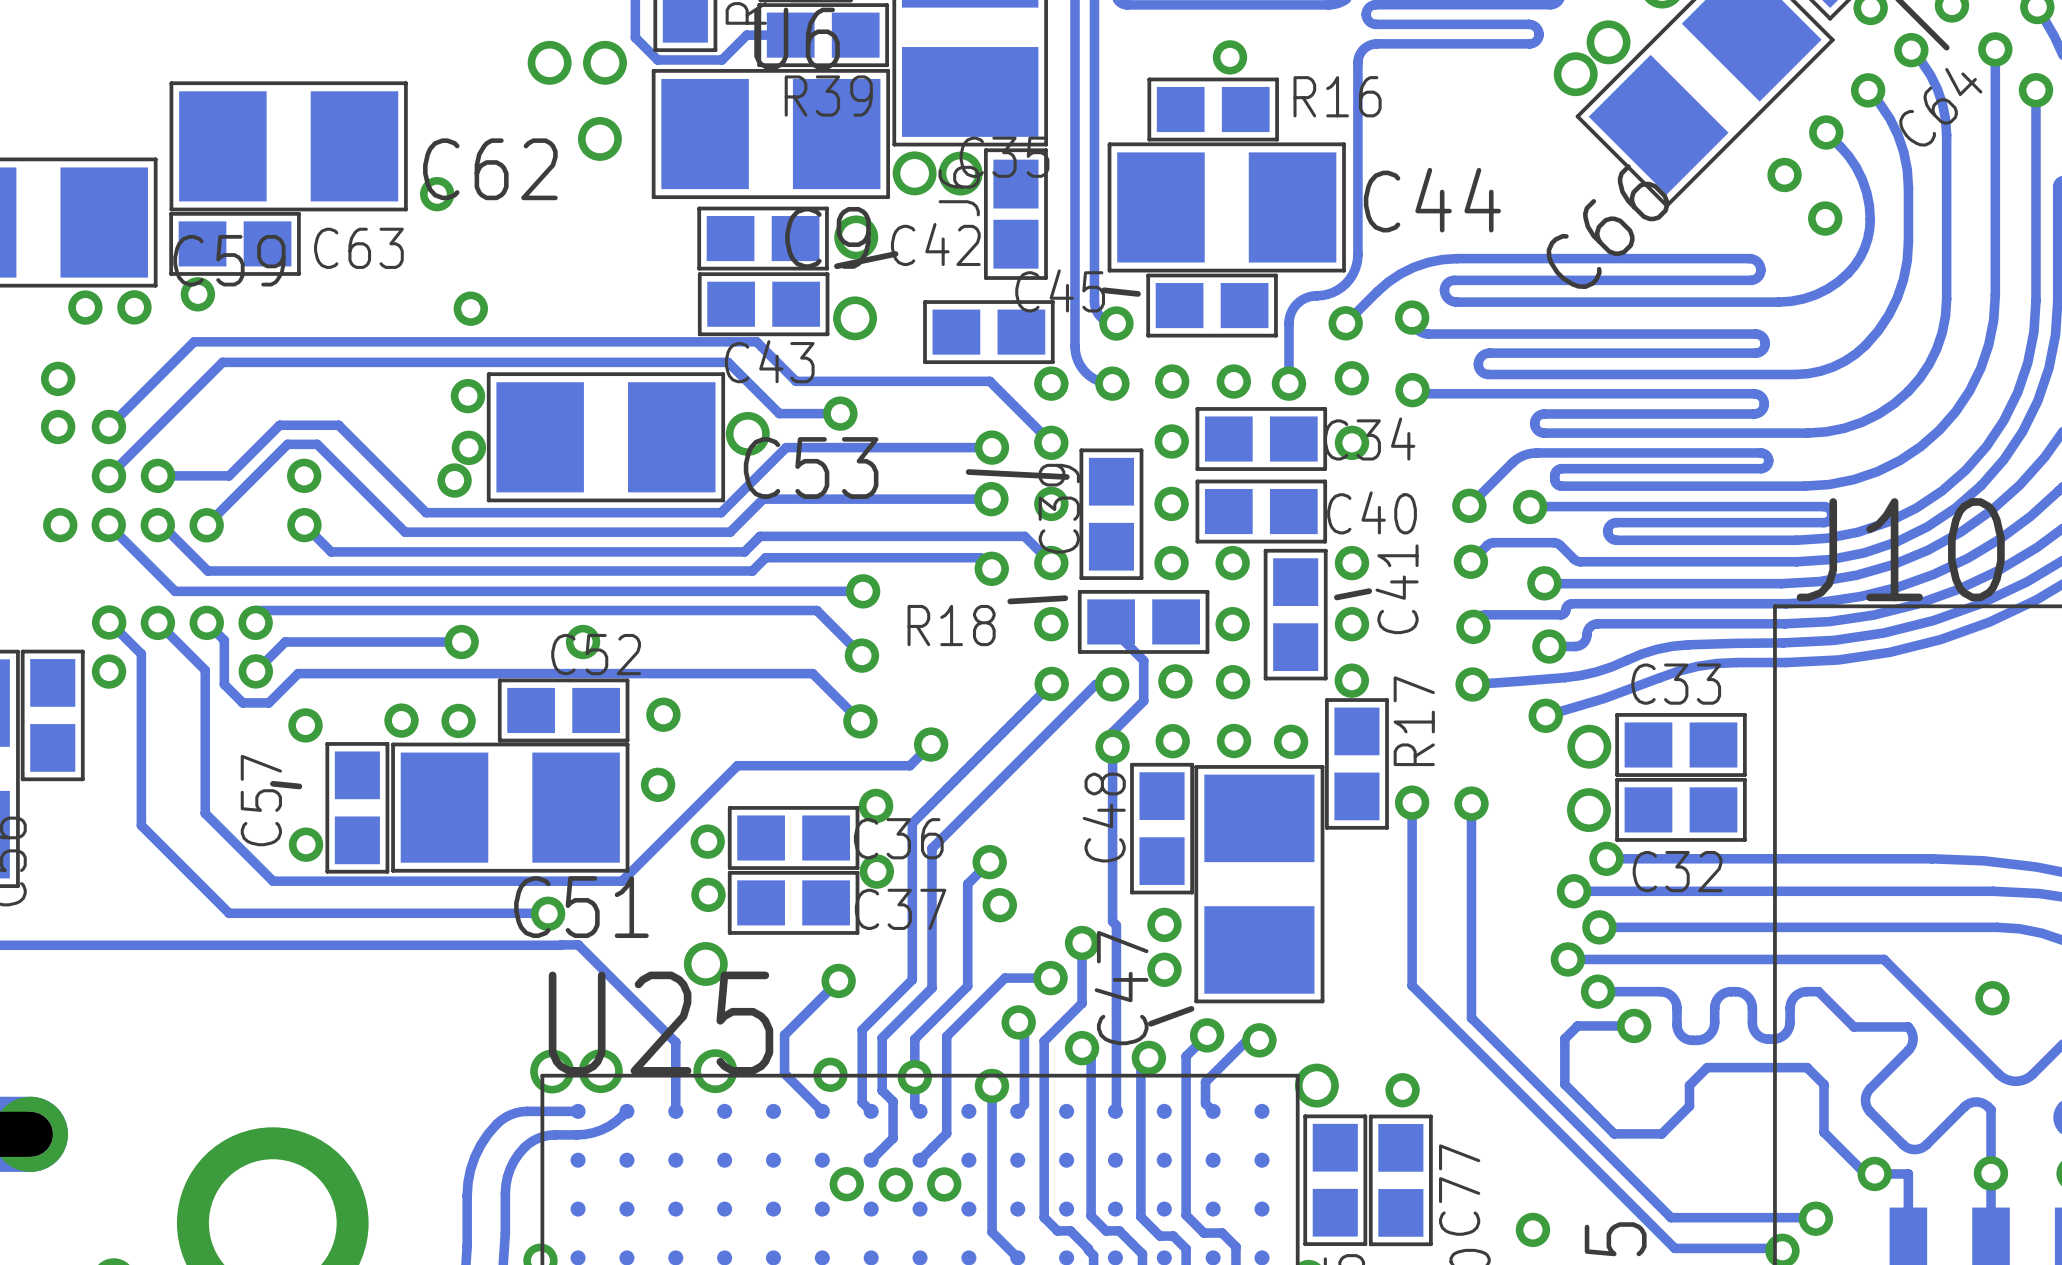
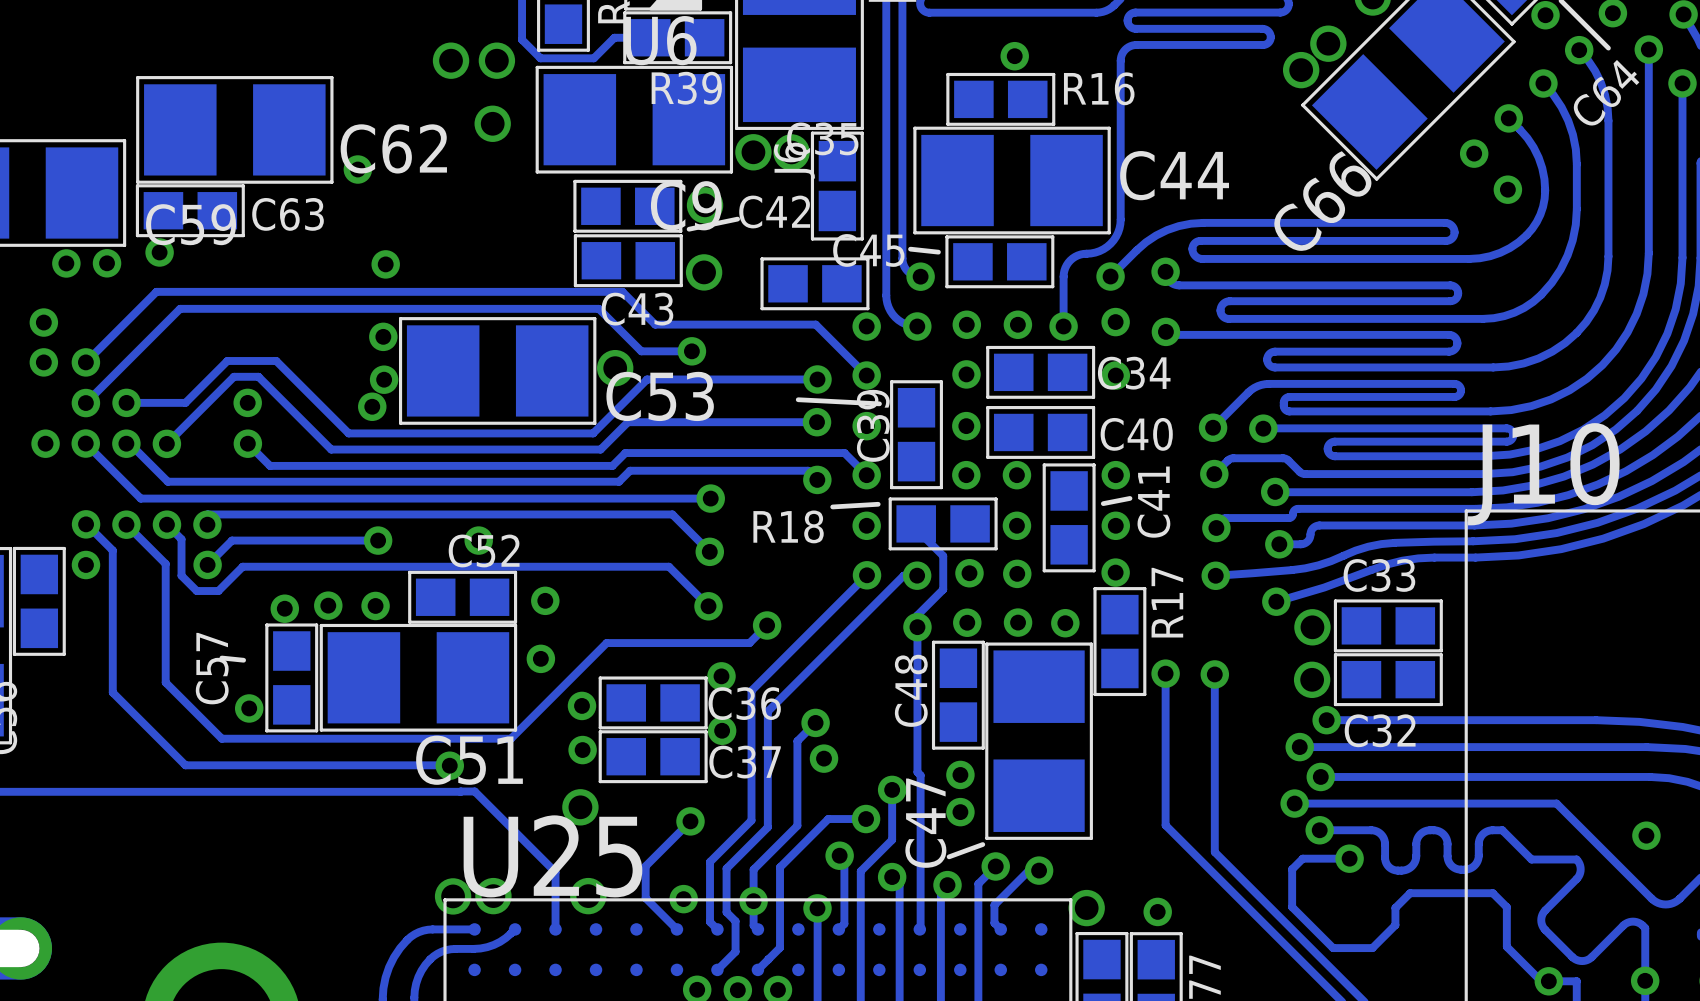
via position: (305, 725) -> (284, 608)

